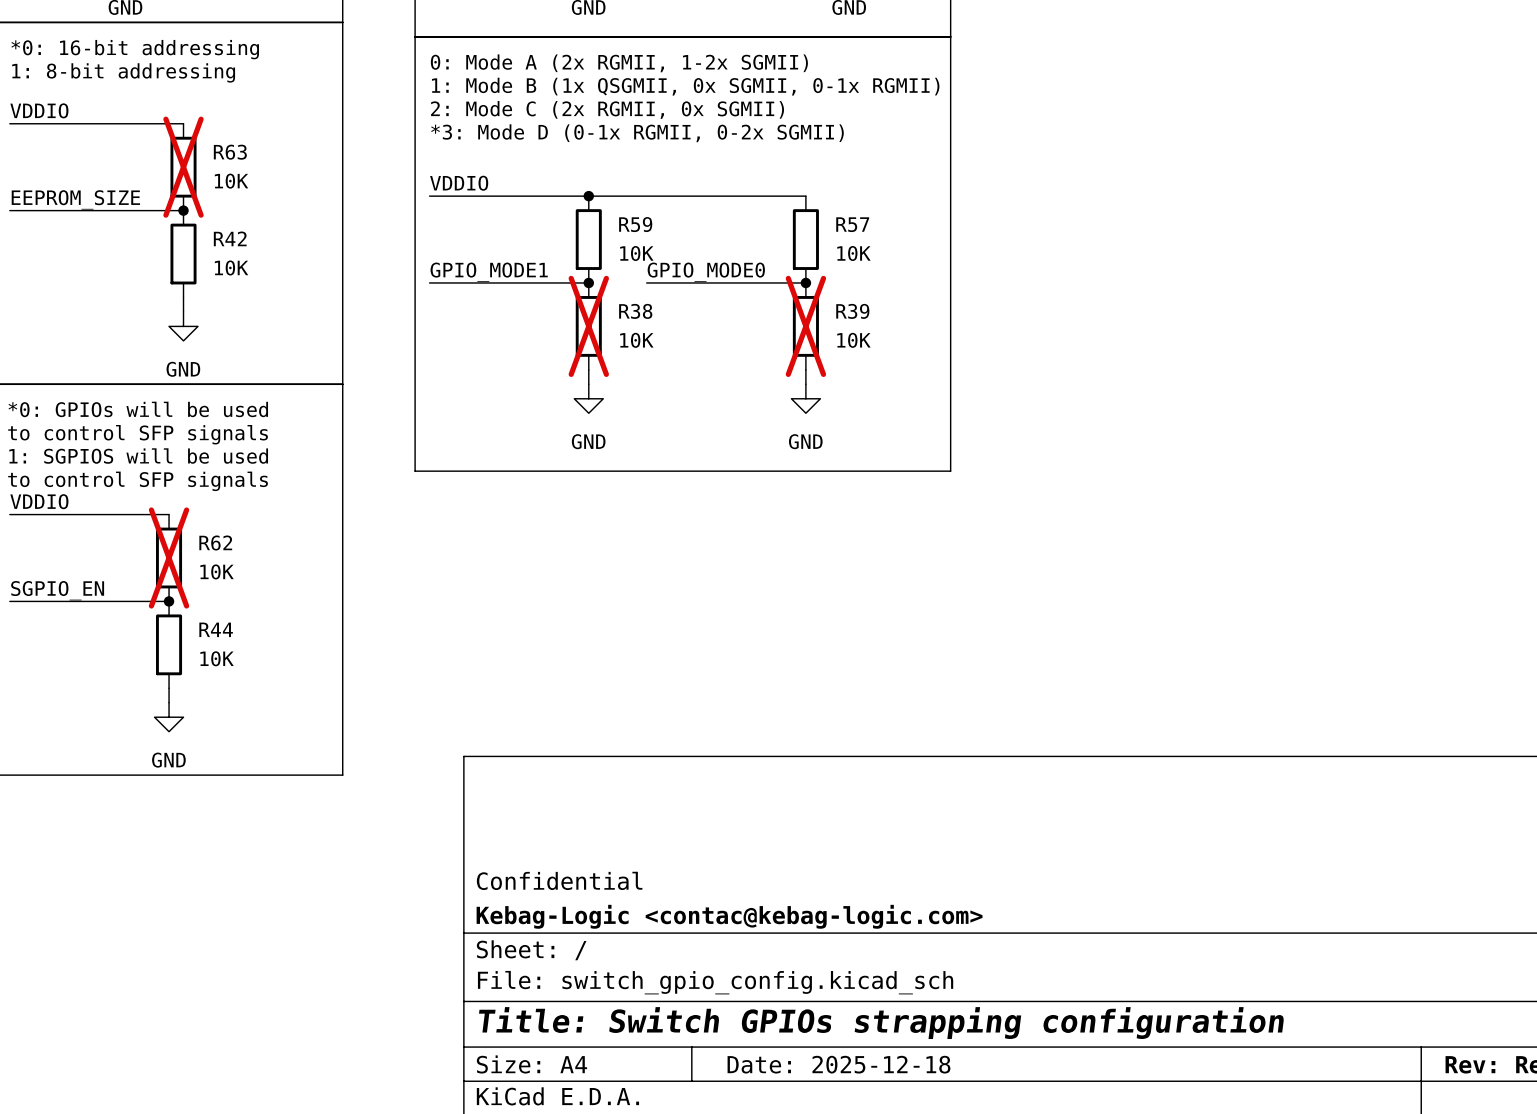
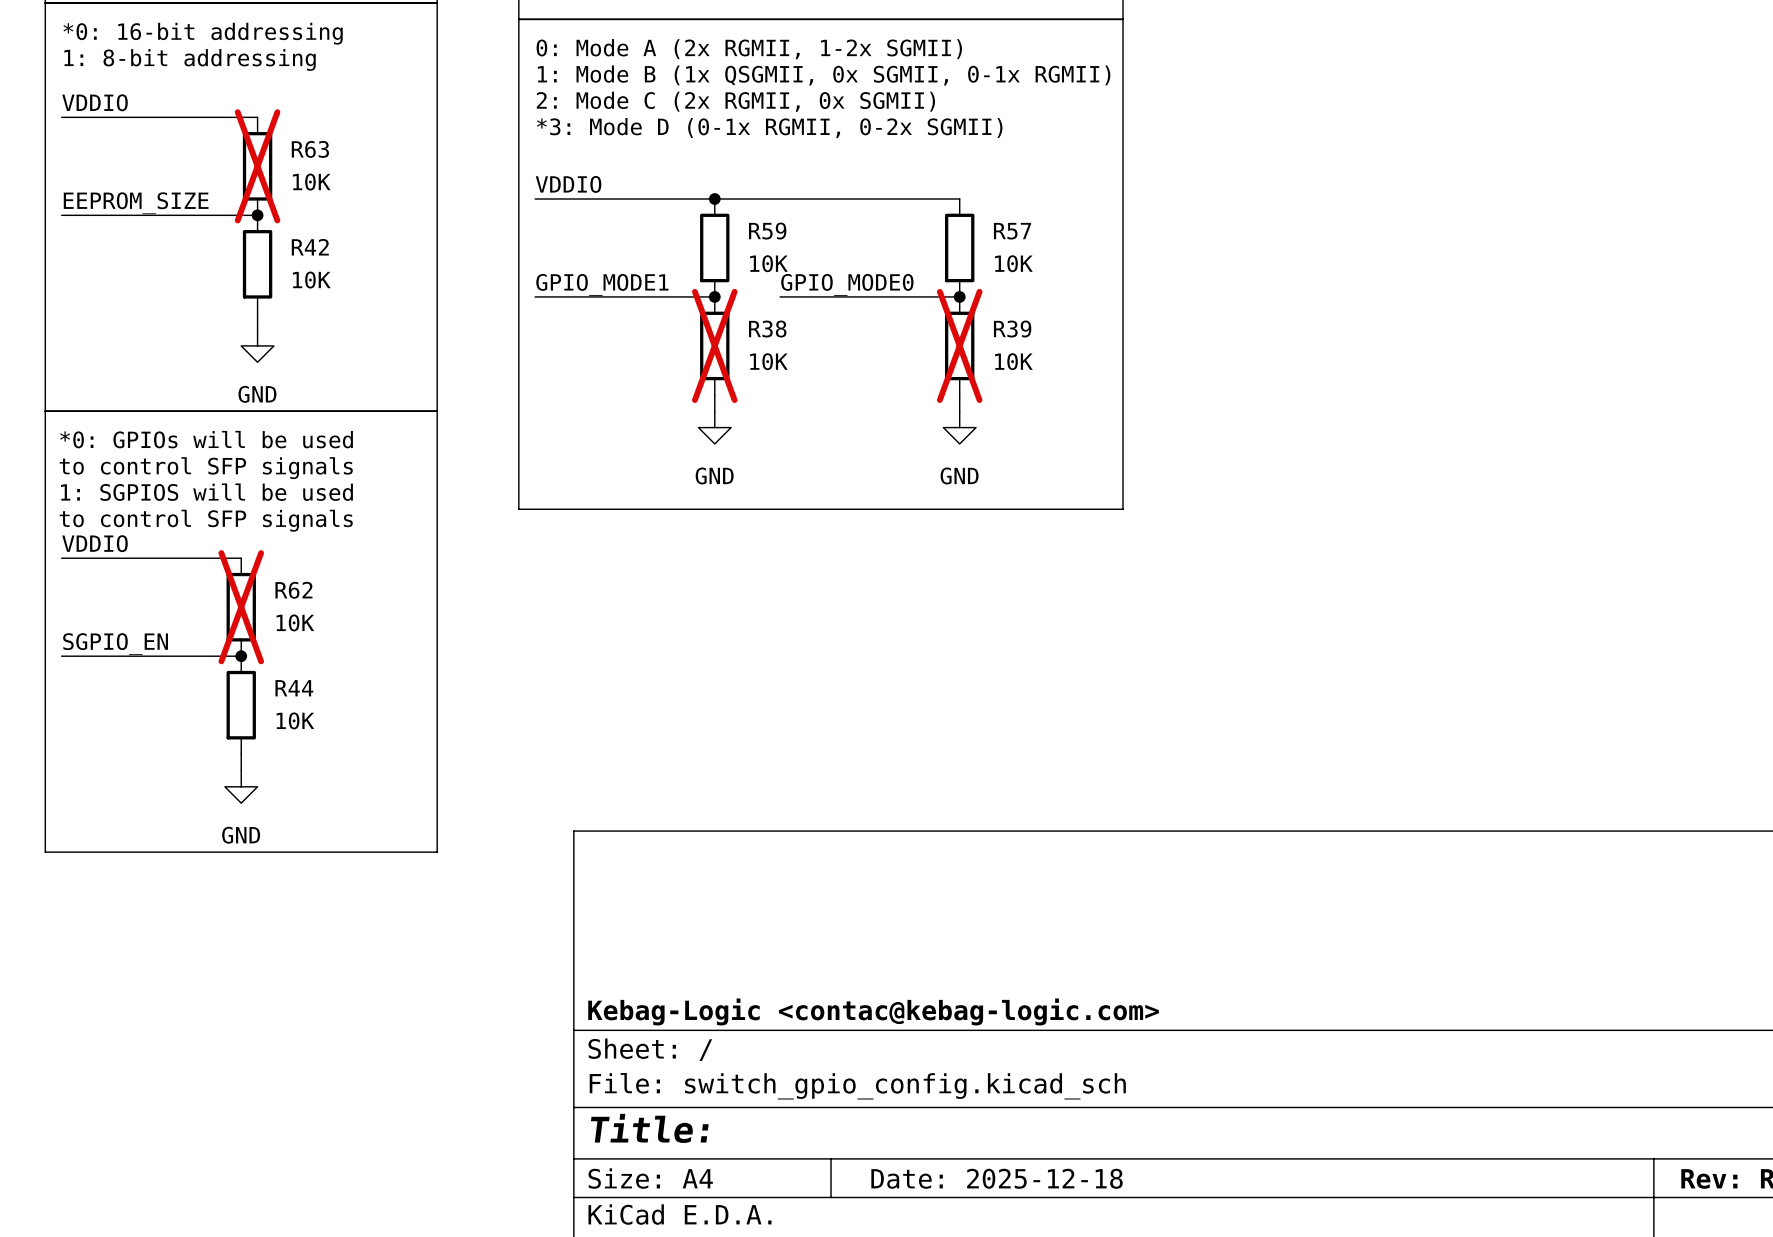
title block: Confidential (559, 880) -> none
title block: Title: Switch GPIOs strapping configuration (881, 1023) -> Title: (649, 1128)

